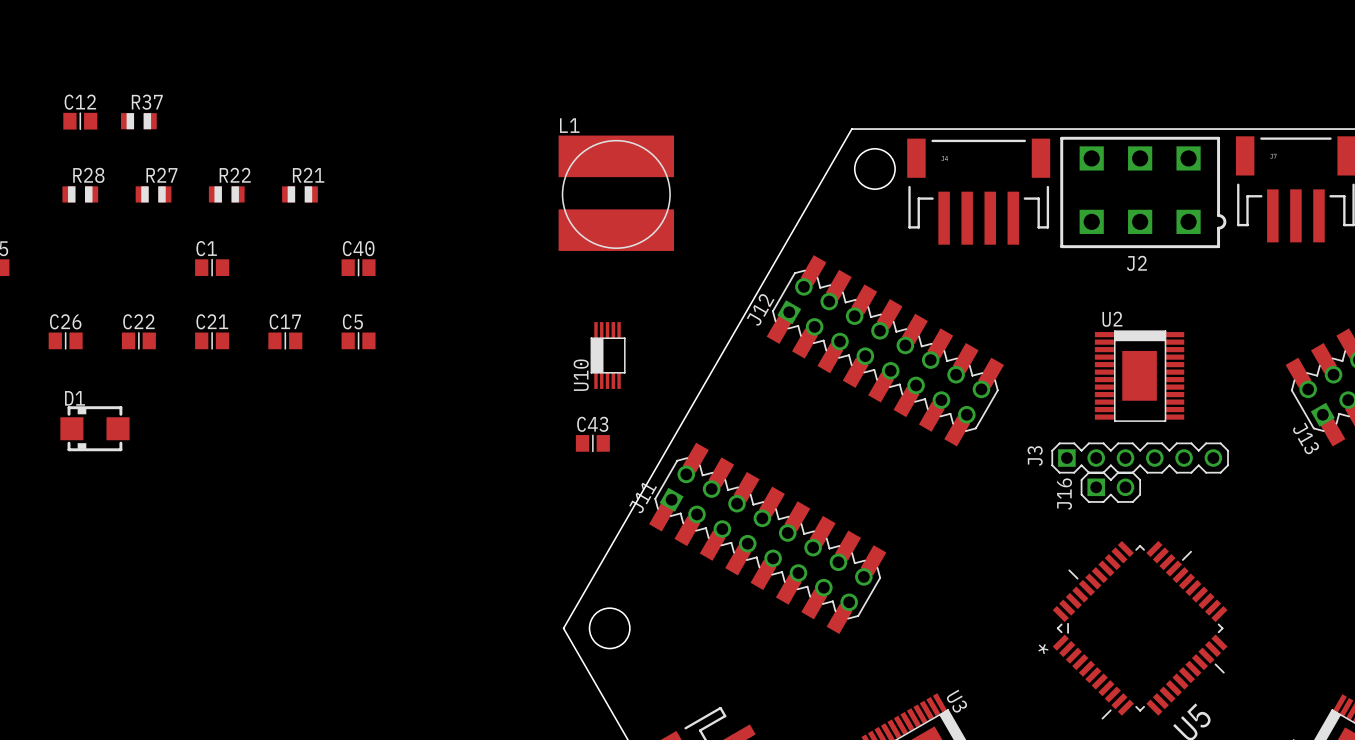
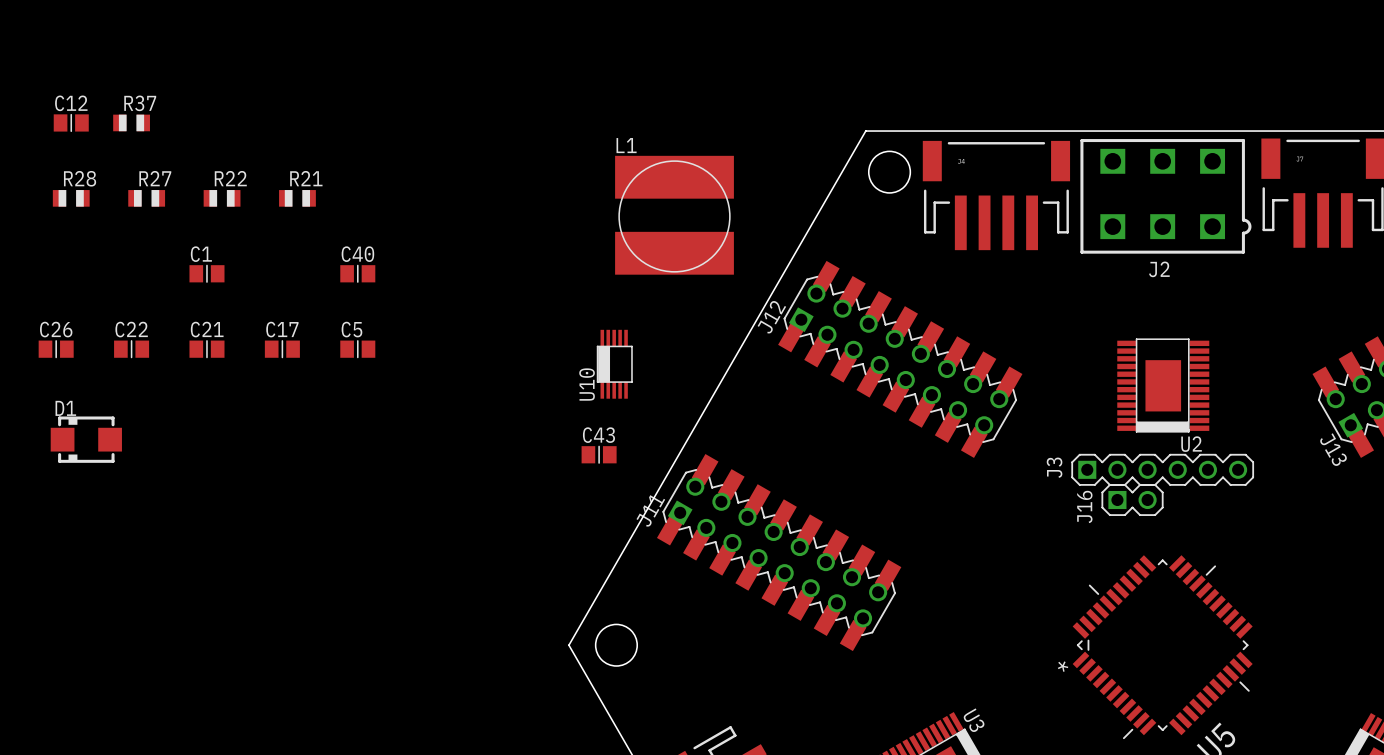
L1 position: (616, 193) -> (674, 215)
U2 rotation: 0° (1139, 376) -> 180° (1163, 385)

